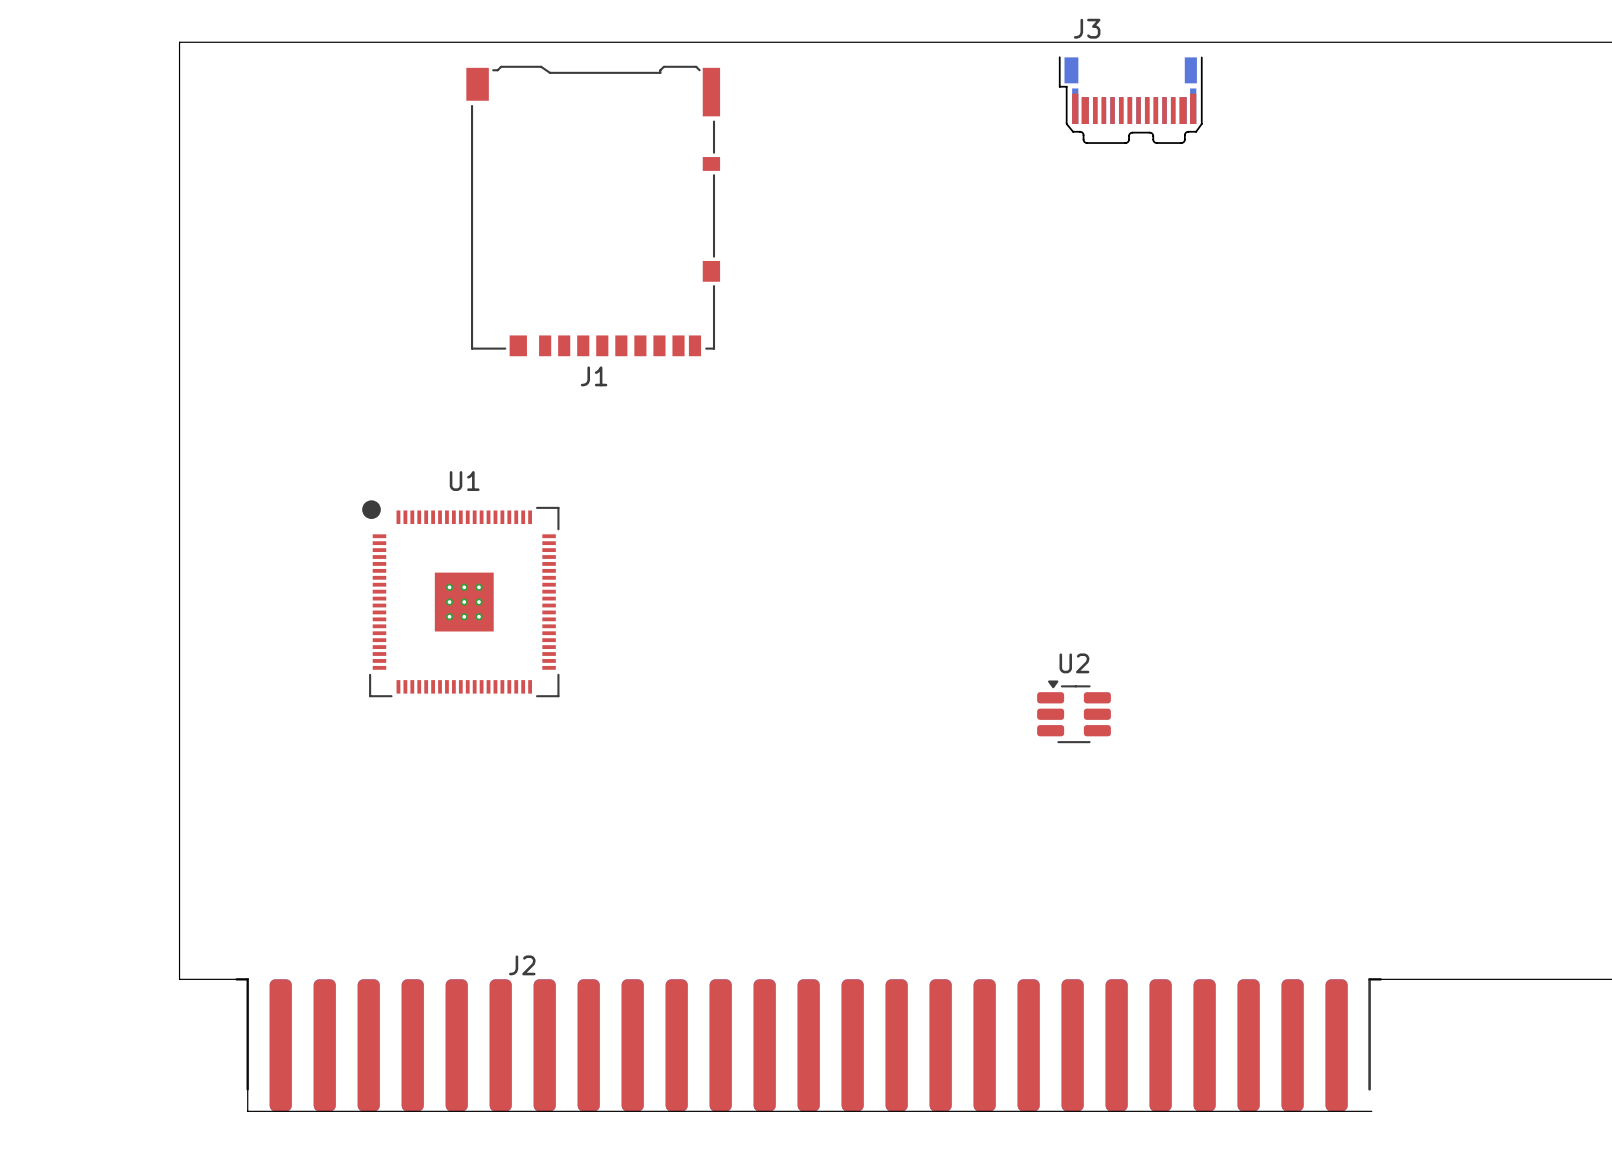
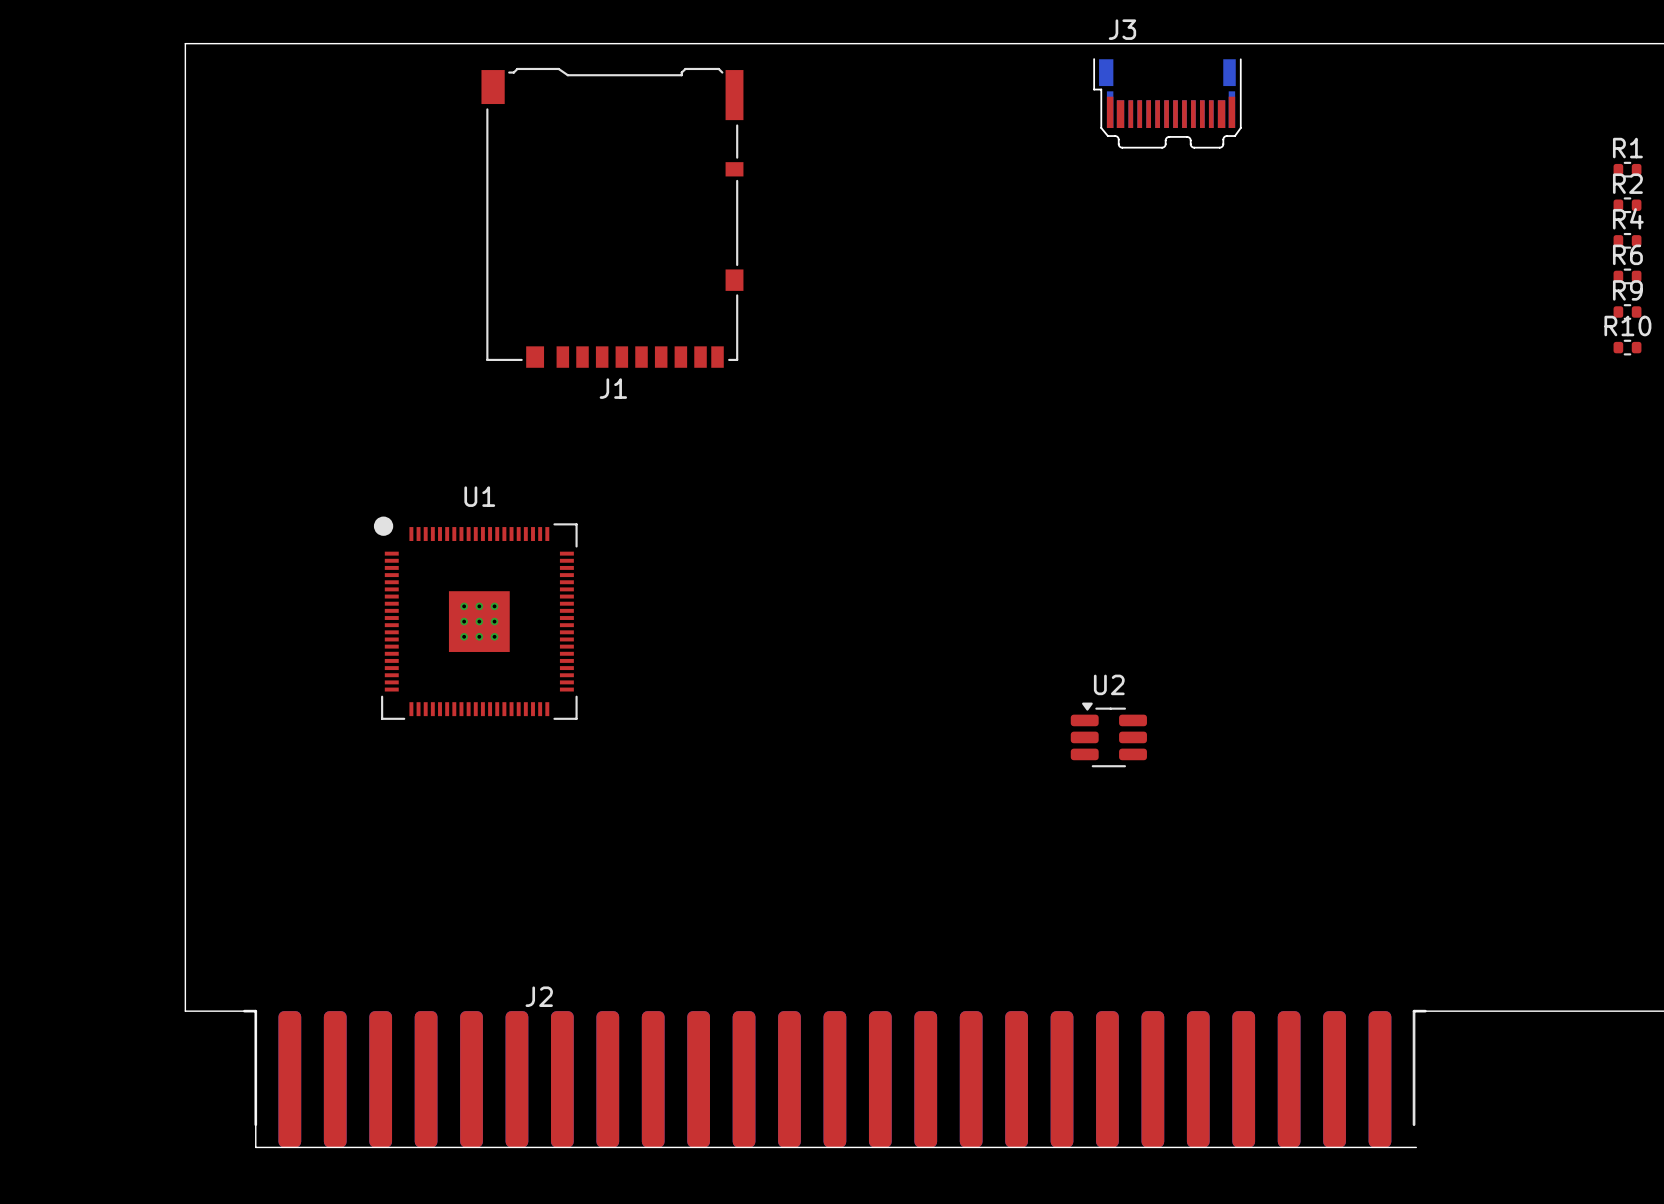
R1: none -> (1627, 169)
R2: none -> (1627, 205)
R4: none -> (1627, 240)
R6: none -> (1627, 276)
R9: none -> (1627, 312)
R10: none -> (1627, 347)

